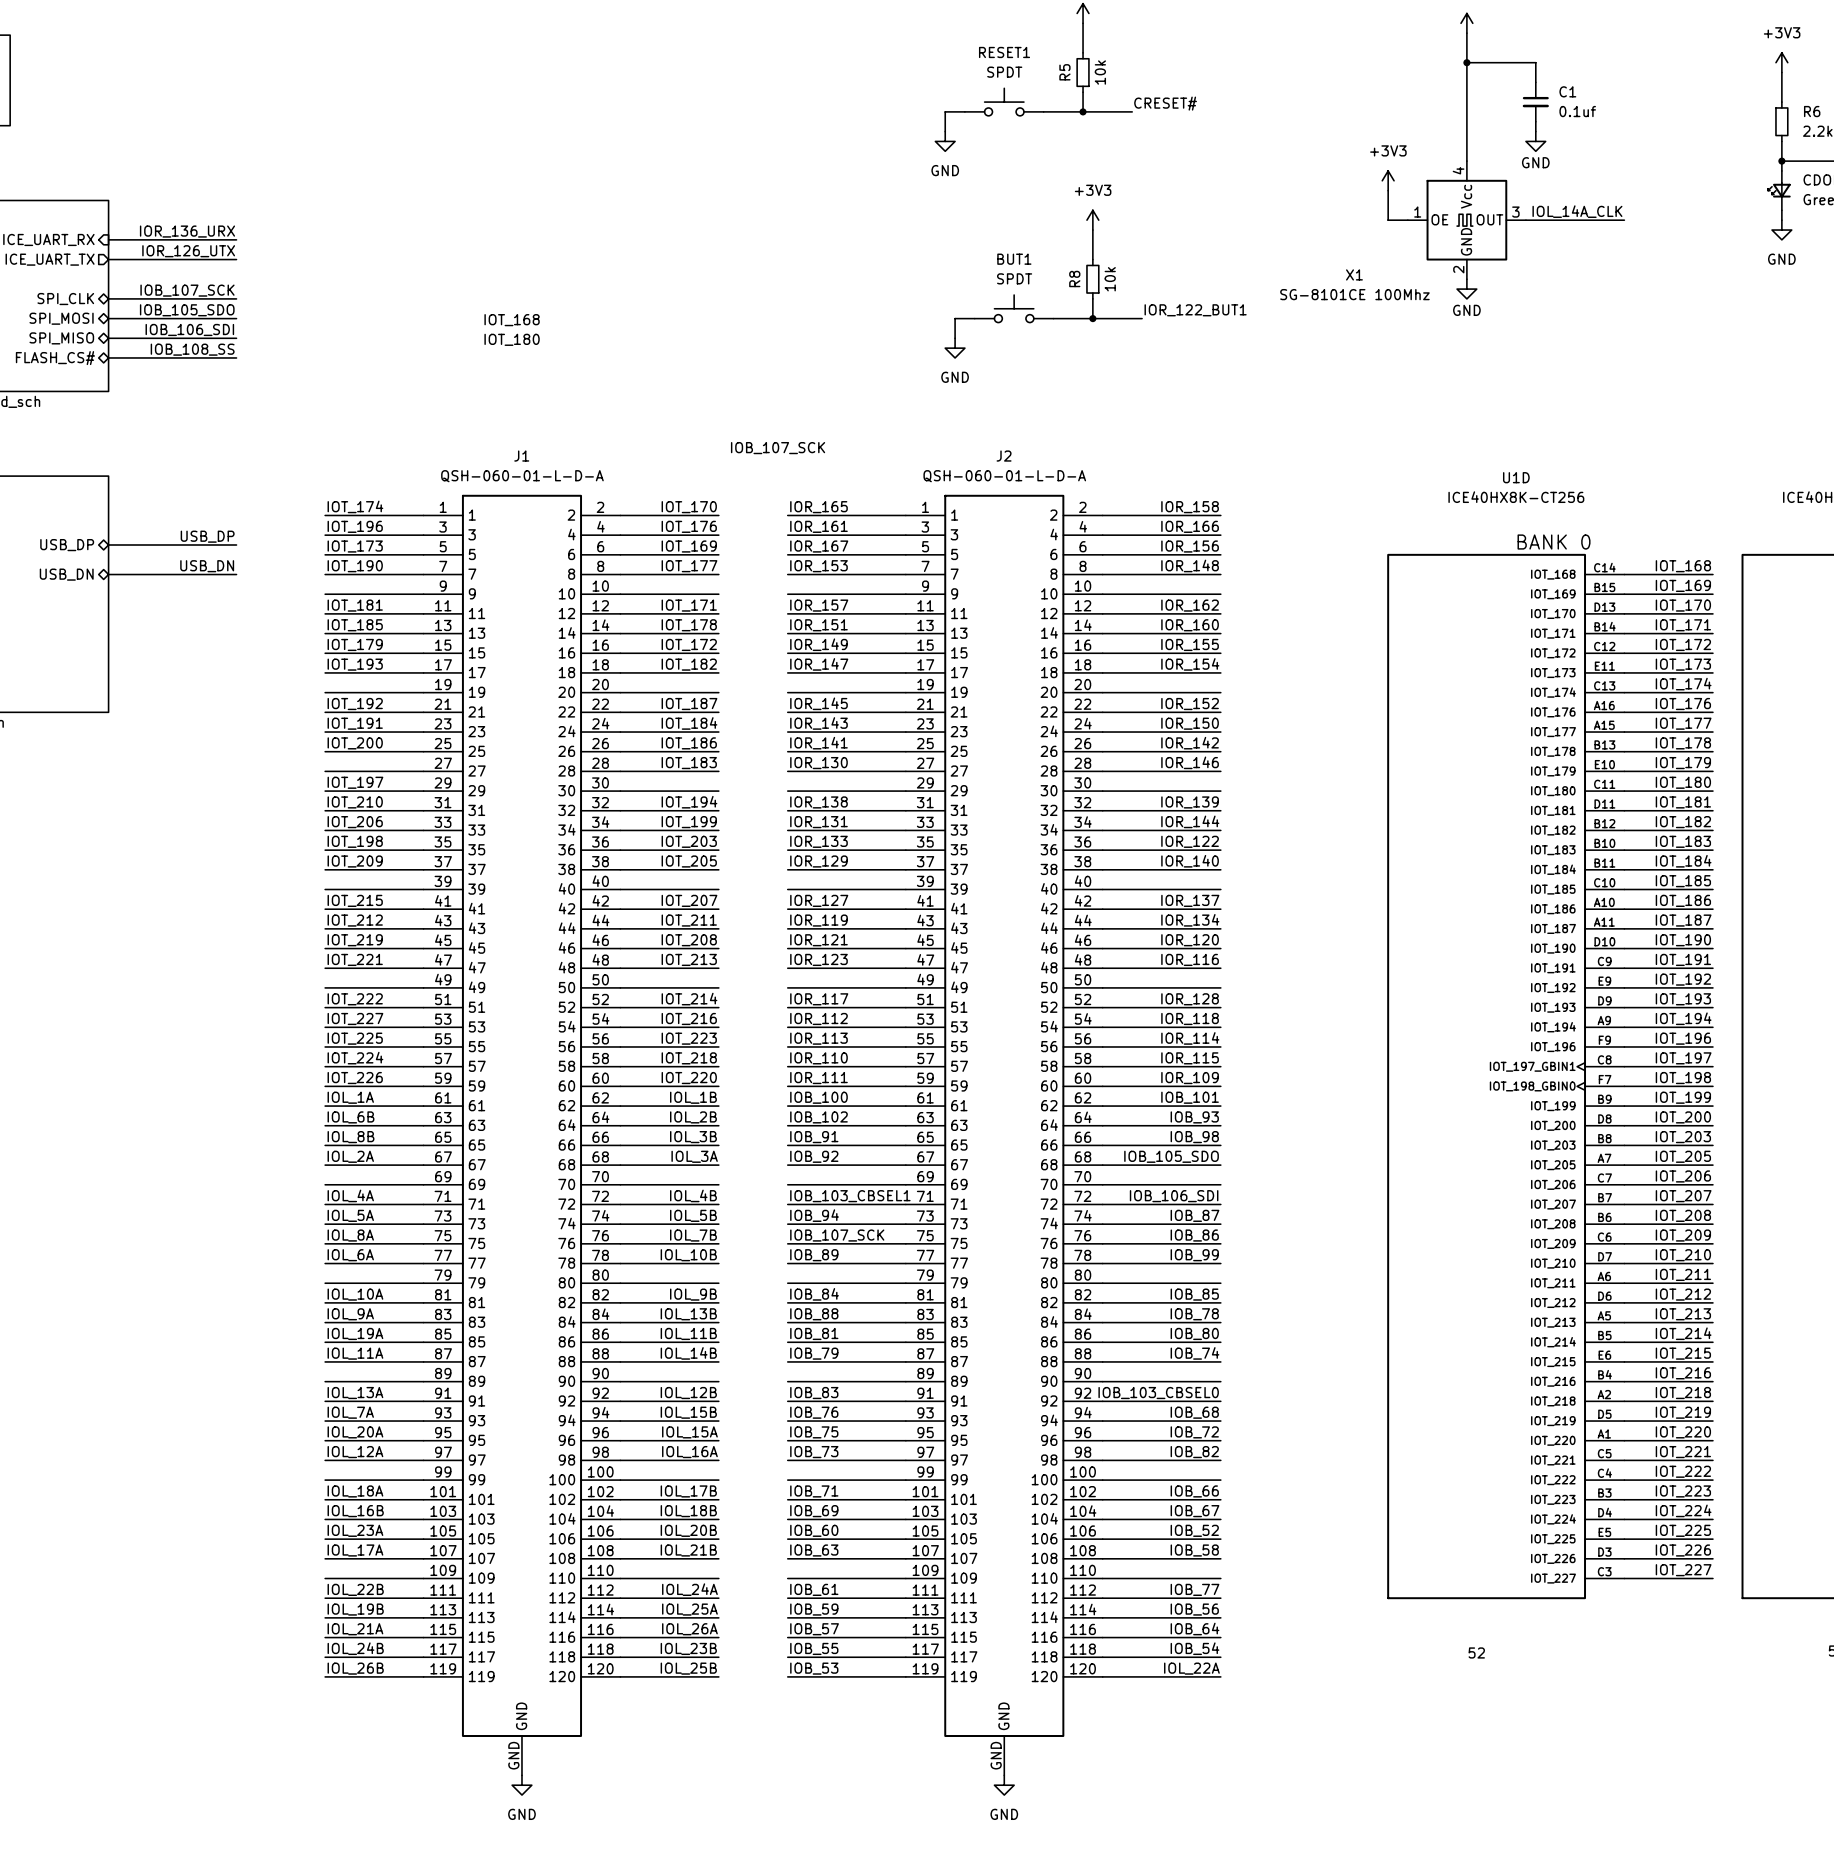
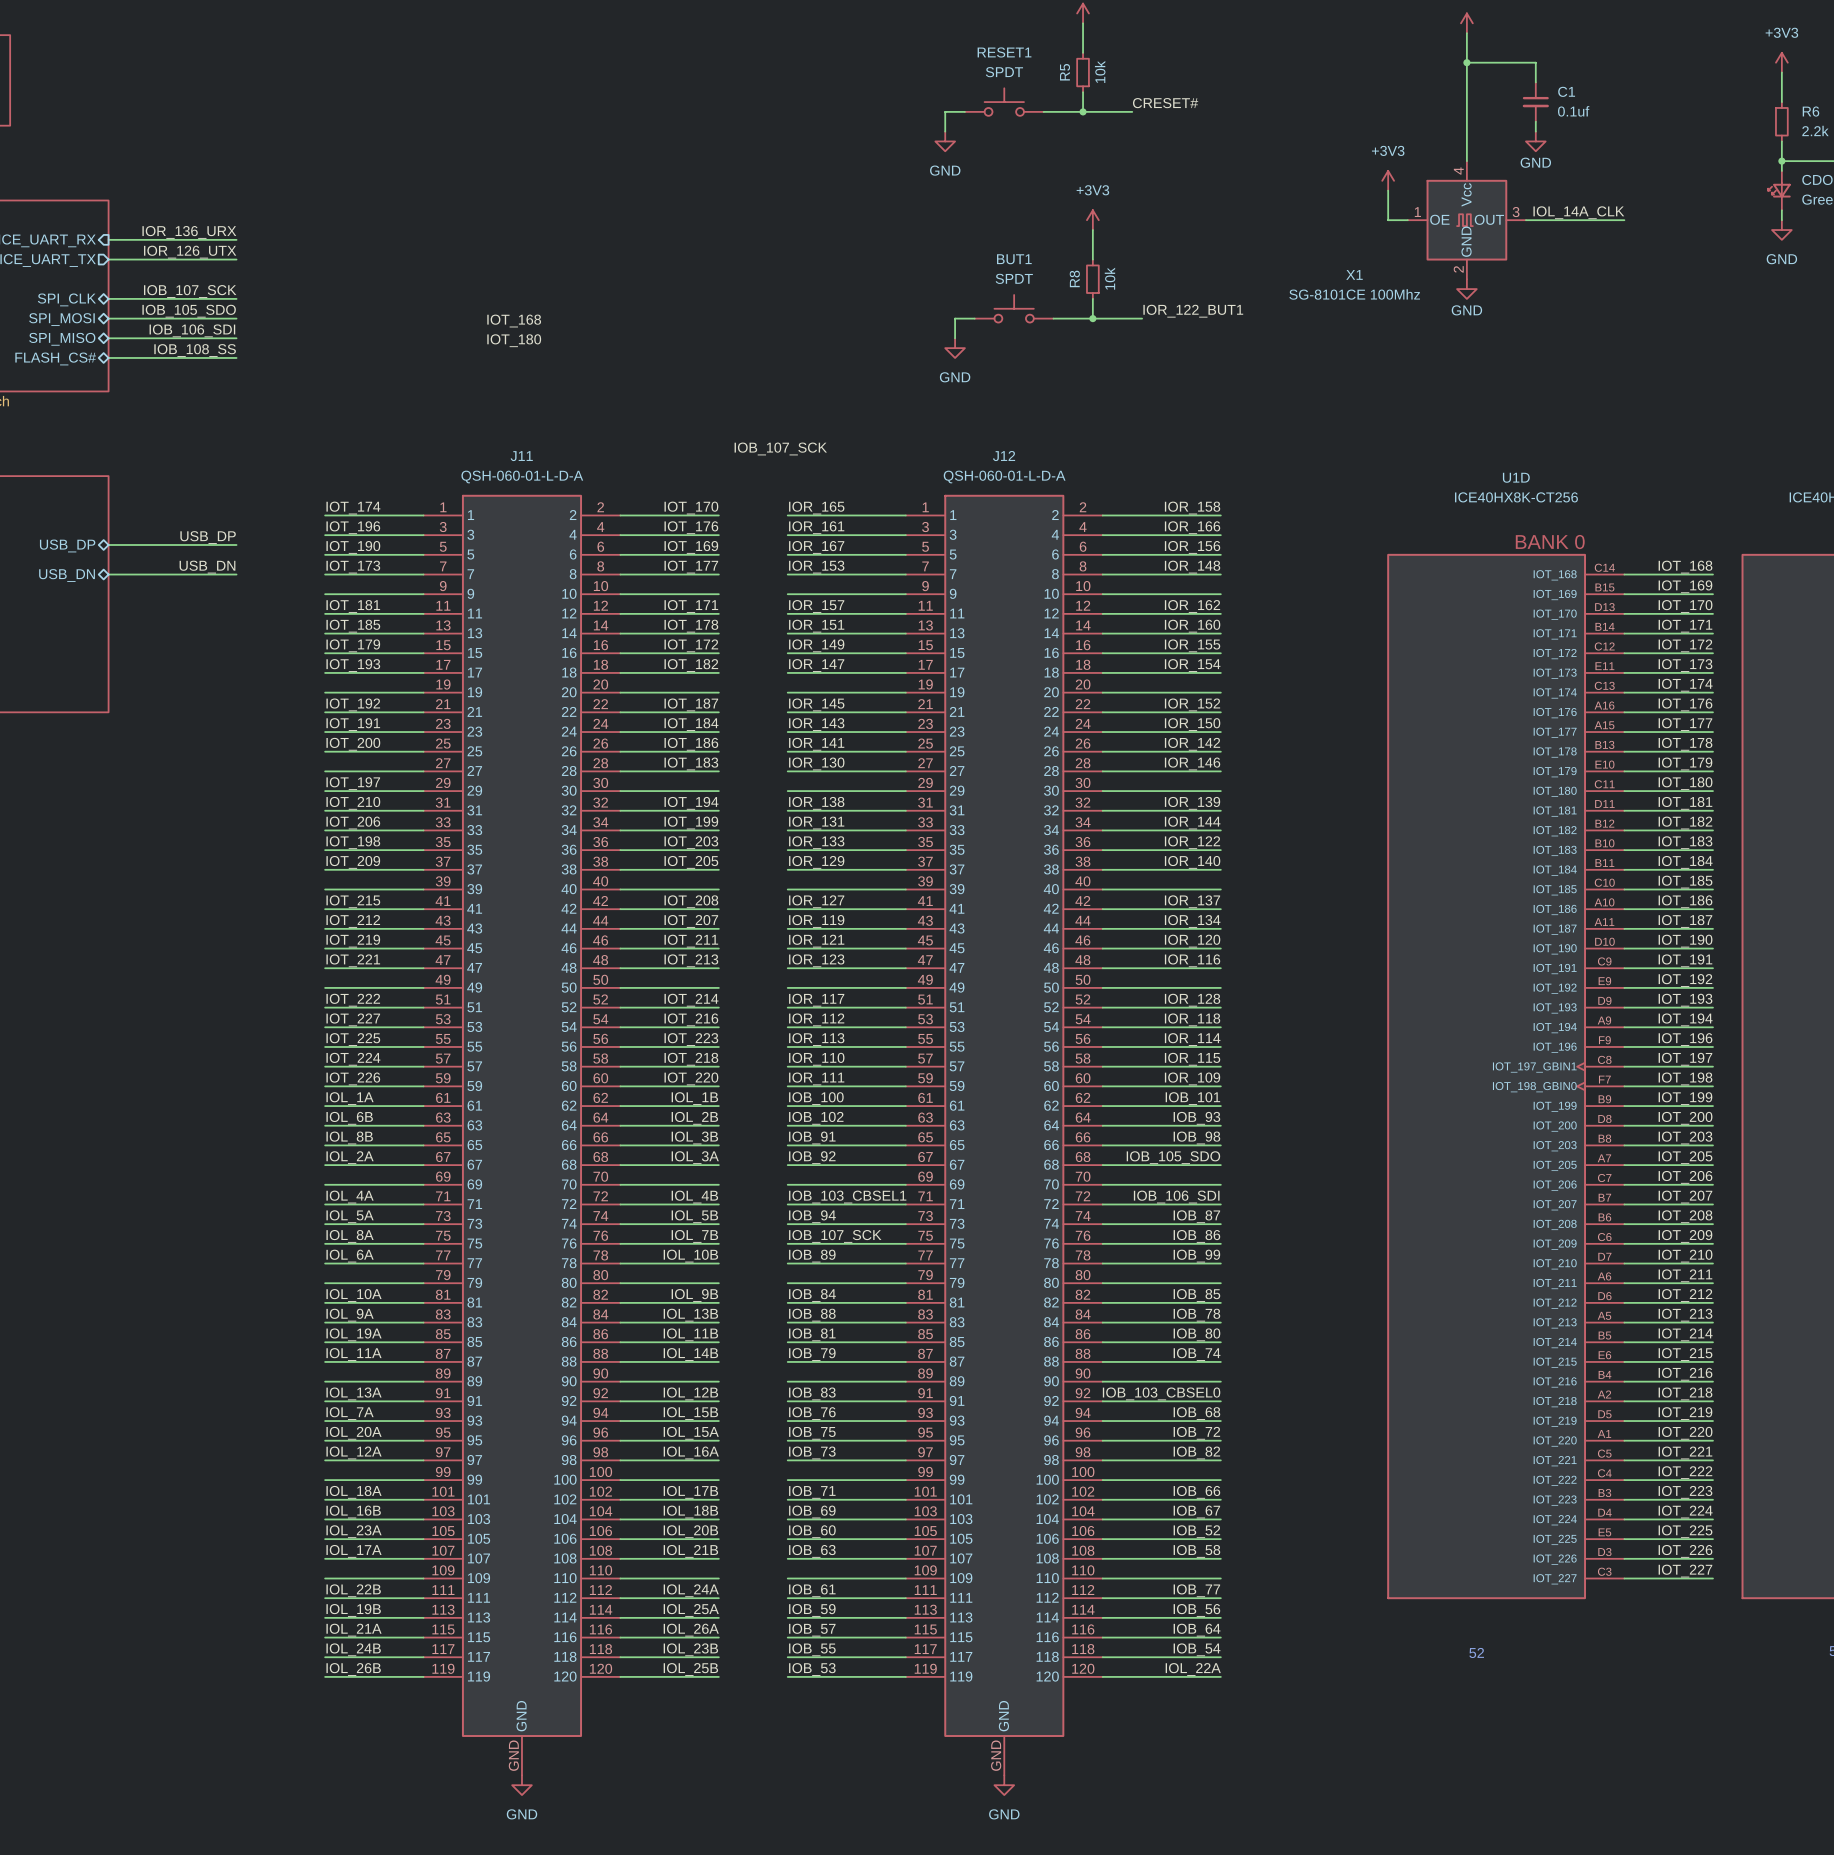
J1 name: J1 (521, 456) -> J11 (521, 456)
J2 name: J2 (1004, 456) -> J12 (1004, 456)
label: IOT_173 (355, 546) -> IOT_190 (353, 547)
label: IOT_190 (355, 566) -> IOT_173 (353, 567)
label: IOT_207 (689, 900) -> IOT_208 (691, 901)
label: IOT_211 (689, 920) -> IOT_207 (691, 921)
label: IOT_208 (689, 940) -> IOT_211 (691, 941)

